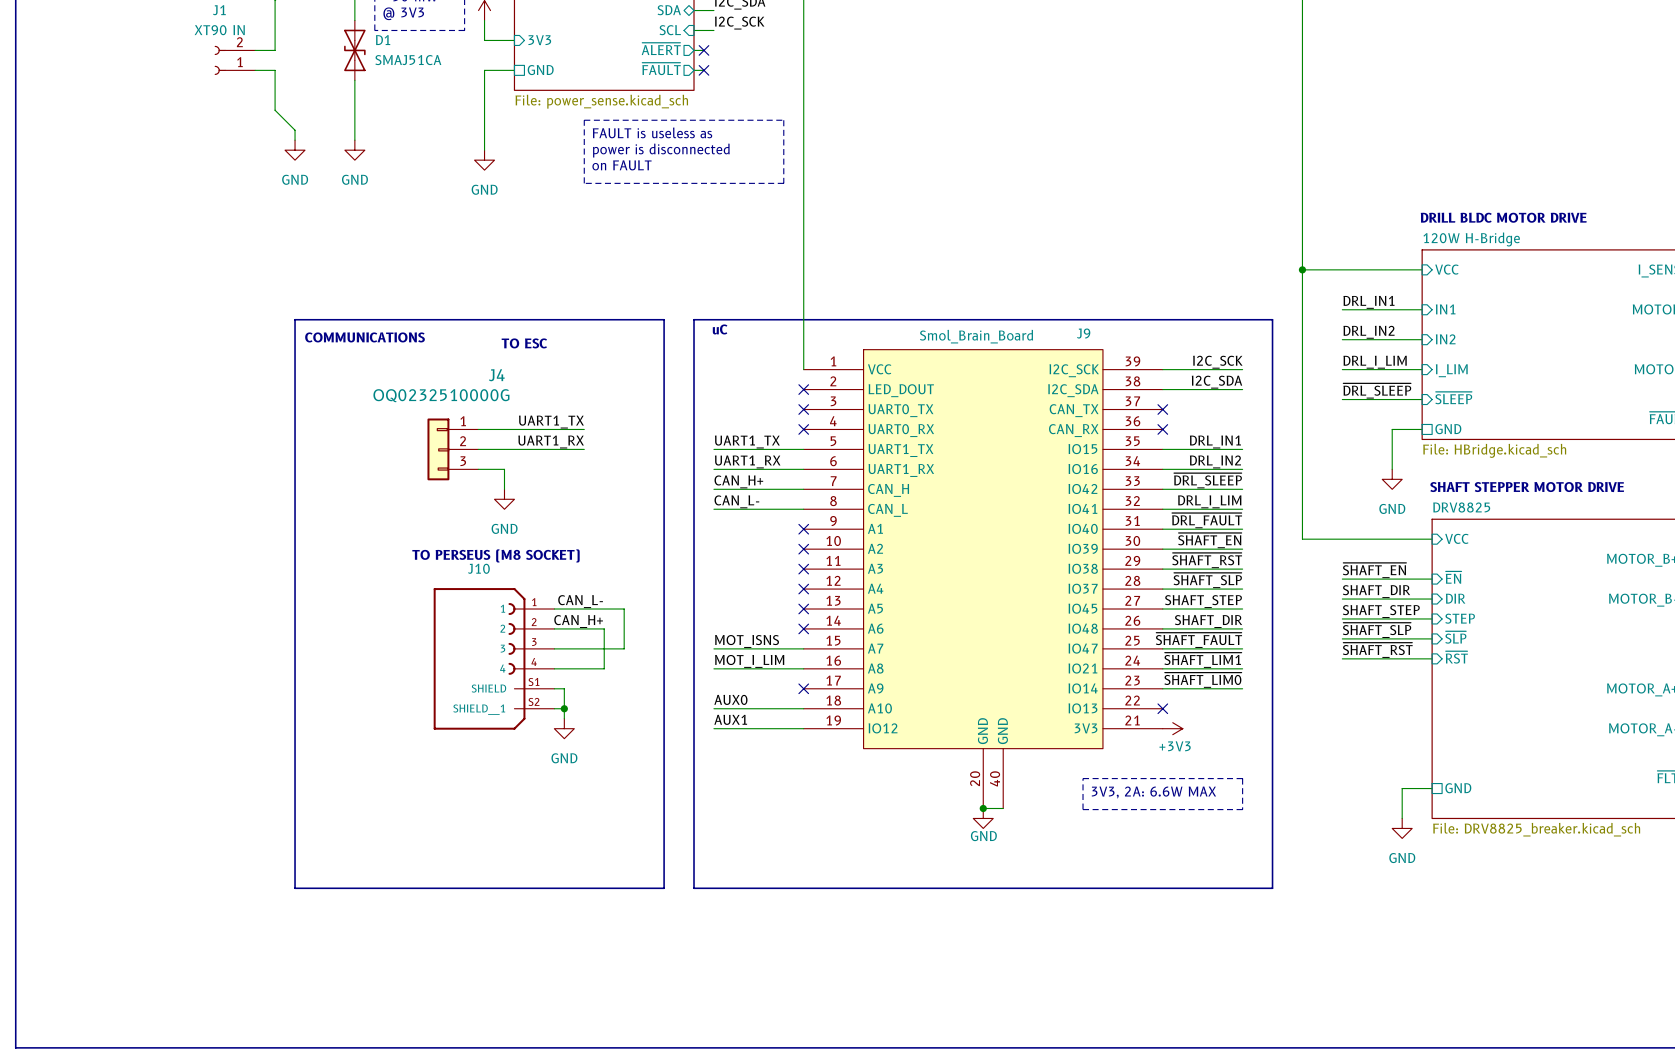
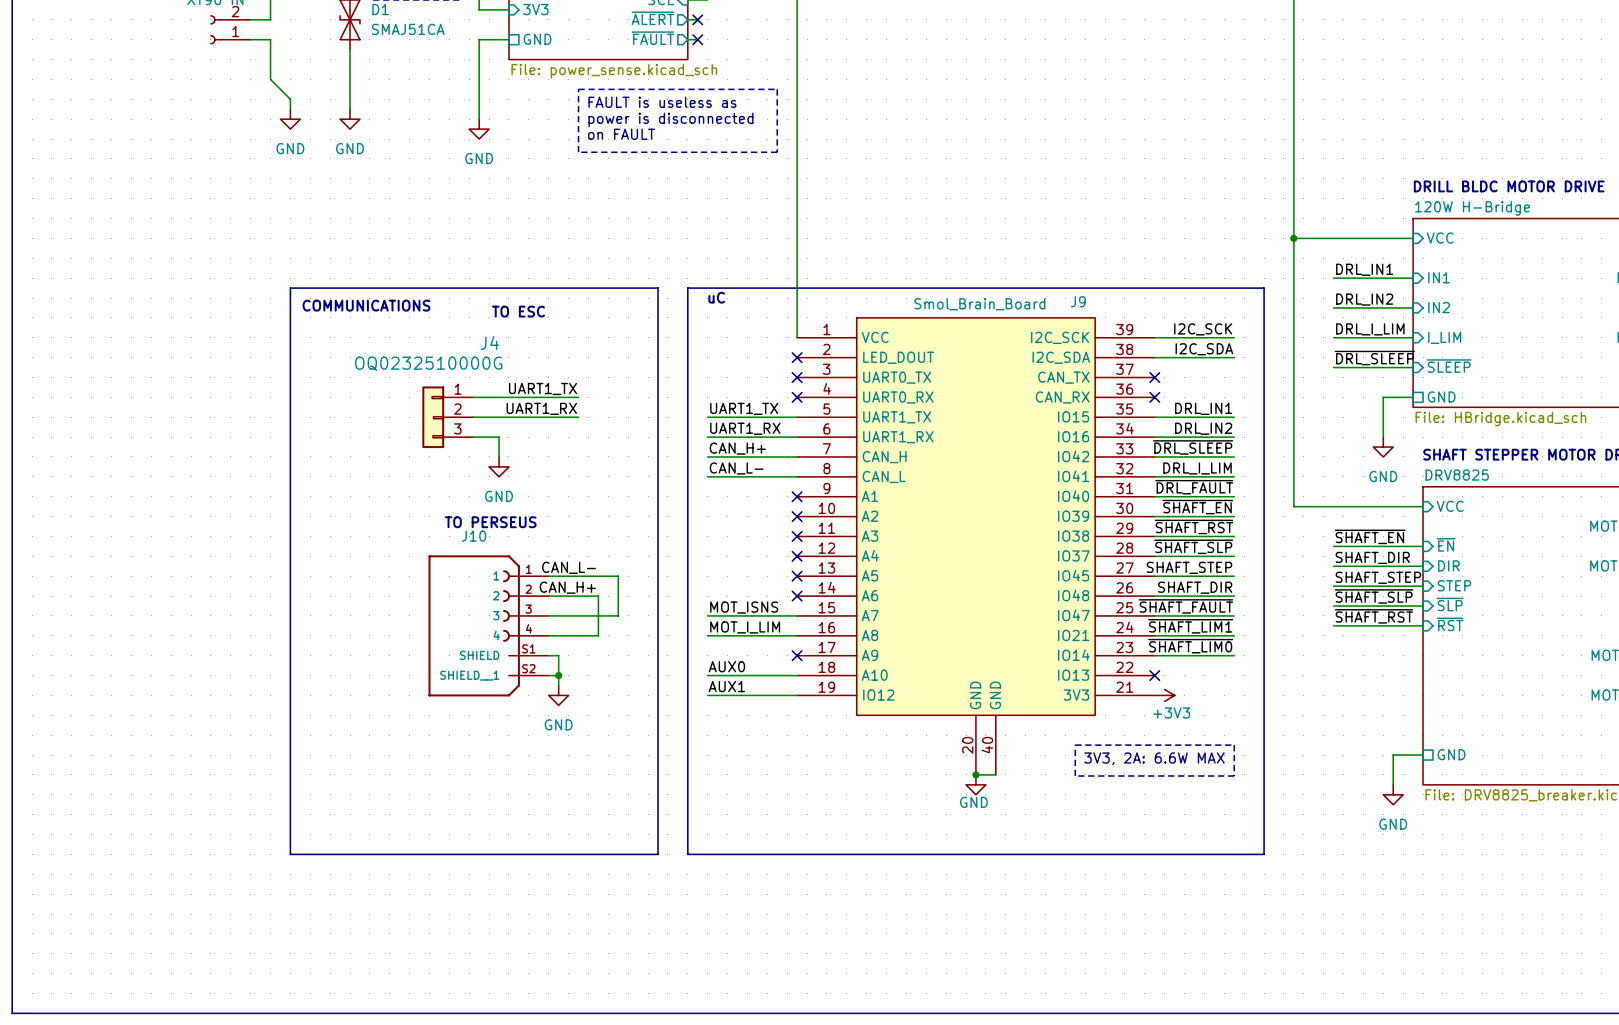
text: TO PERSEUS (M8 SOCKET) (496, 555) -> TO PERSEUS (490, 522)

